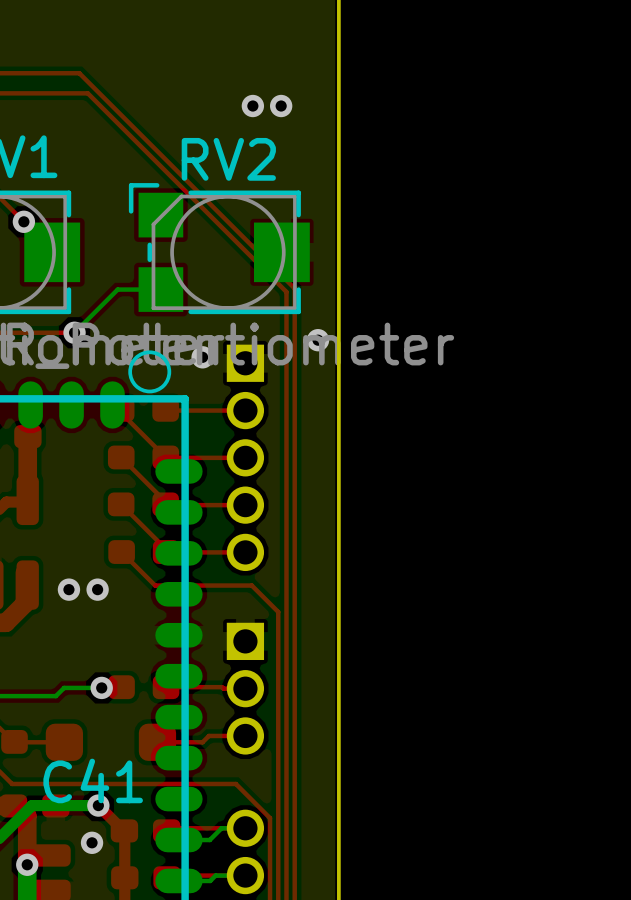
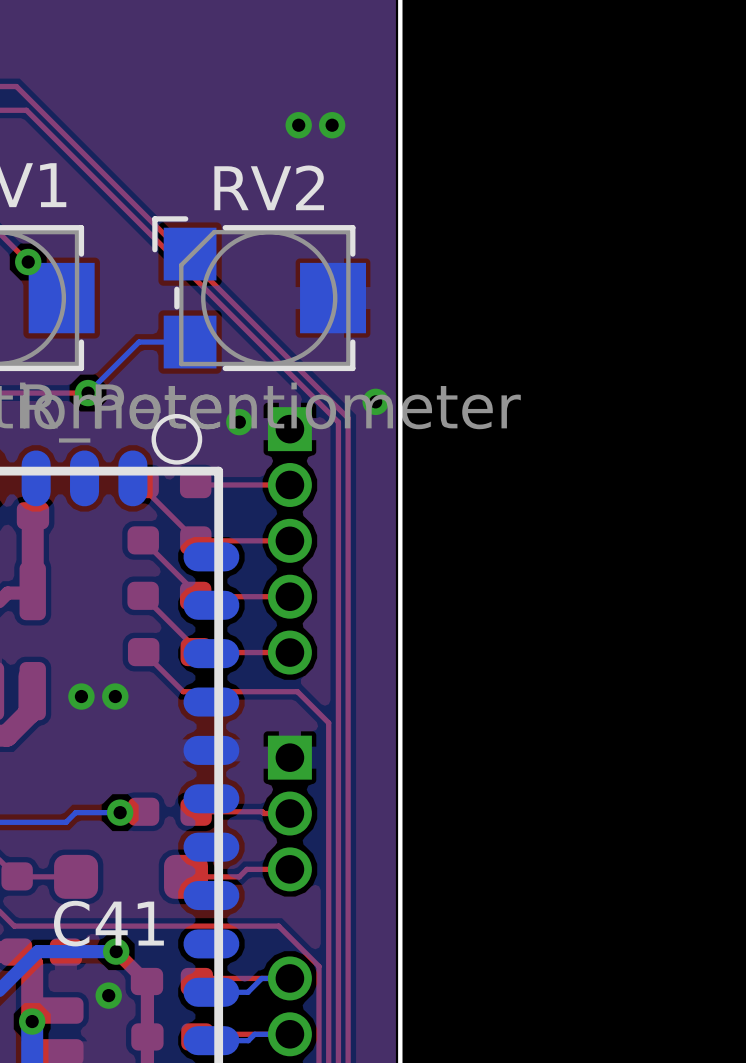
top track: (13, 73) (79, 73) (294, 288) (294, 354) -> (16, 86) (348, 418)
top track: (22, 93) (87, 93) (286, 292) (286, 357) -> (26, 110) (338, 422)

